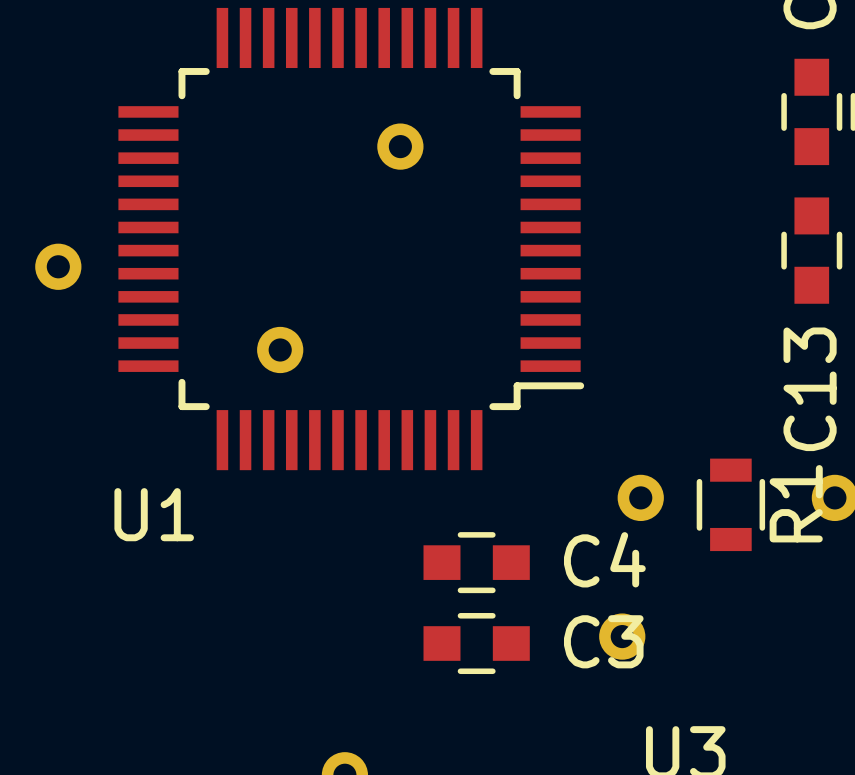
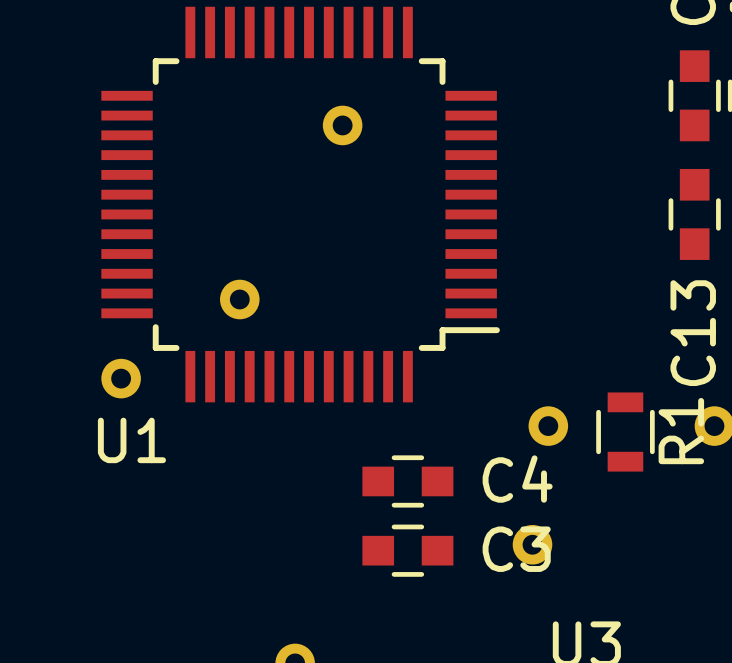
part position: (58, 266) -> (121, 378)

